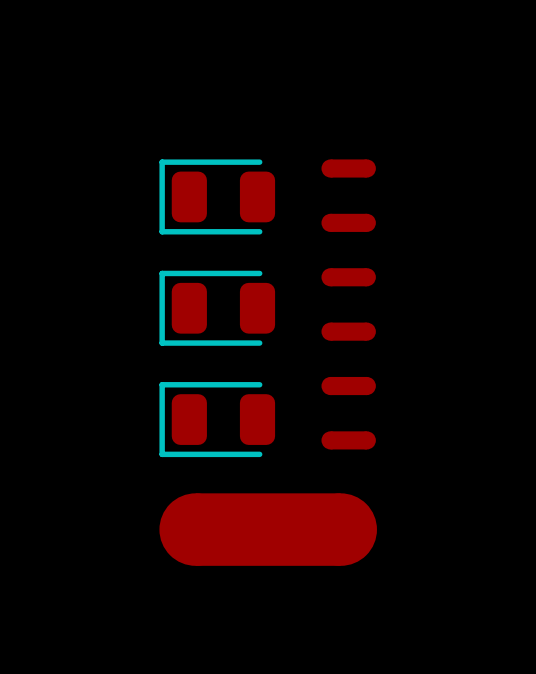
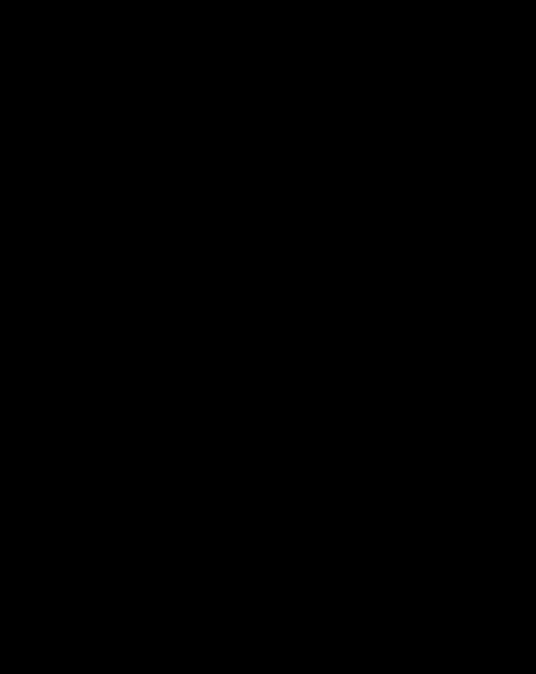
part: (348, 168) -> none
part: (217, 196) -> none
part: (348, 222) -> none
part: (348, 277) -> none
part: (217, 308) -> none
part: (348, 331) -> none
part: (348, 386) -> none
part: (217, 419) -> none
part: (348, 440) -> none
part: (268, 529) -> none

